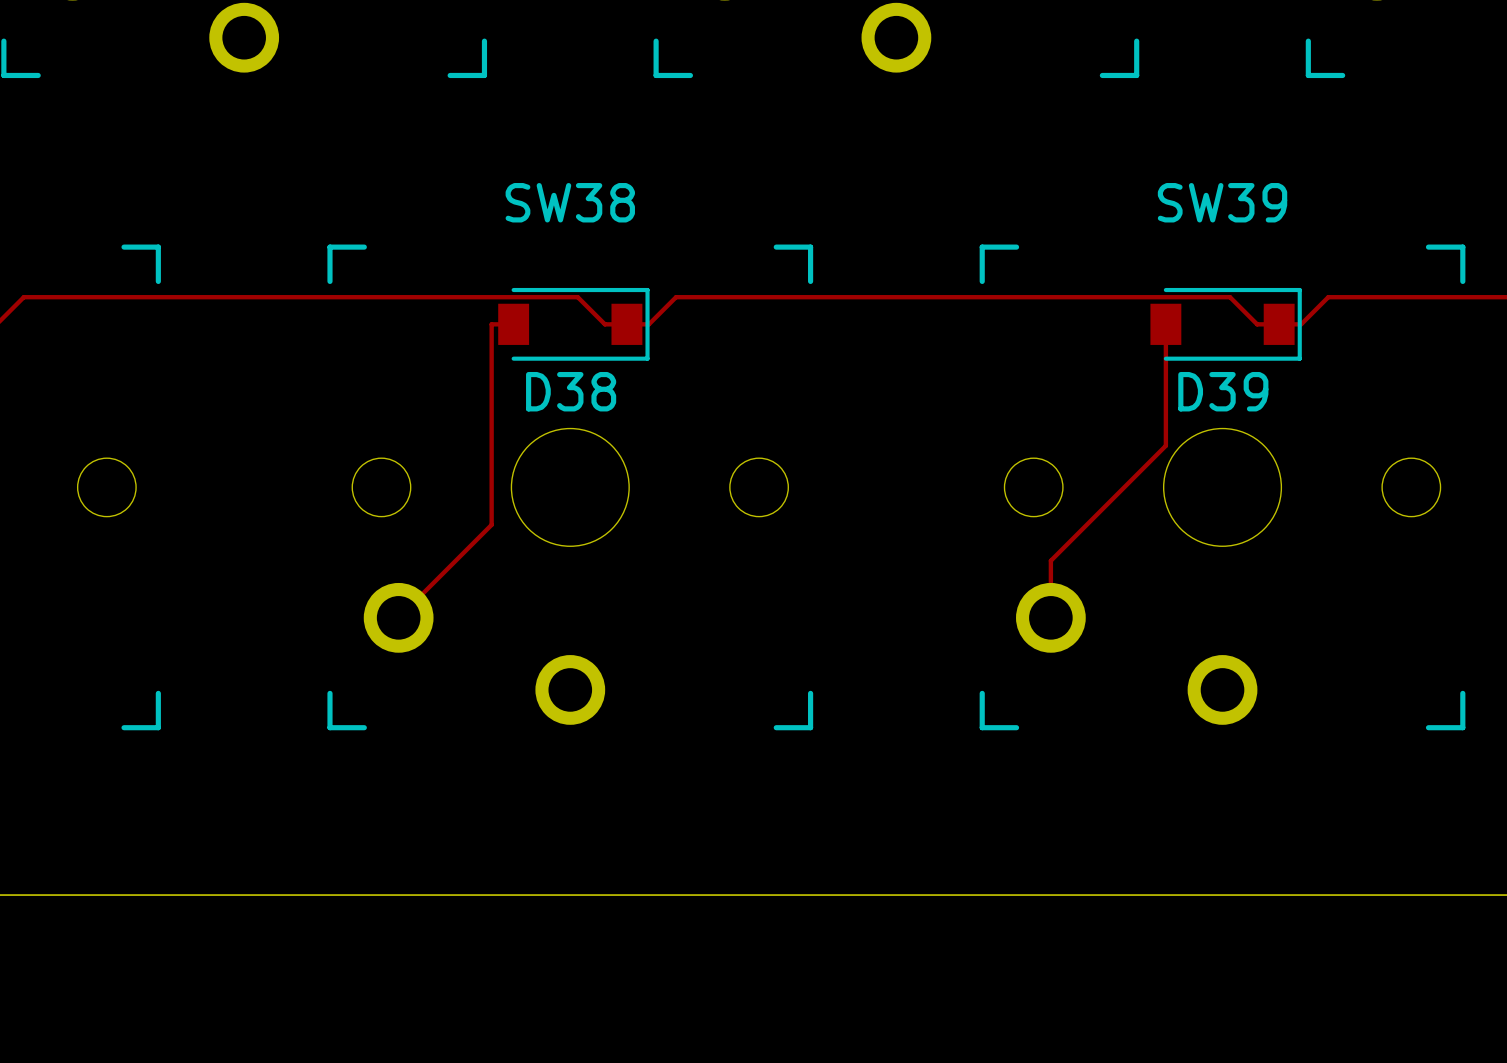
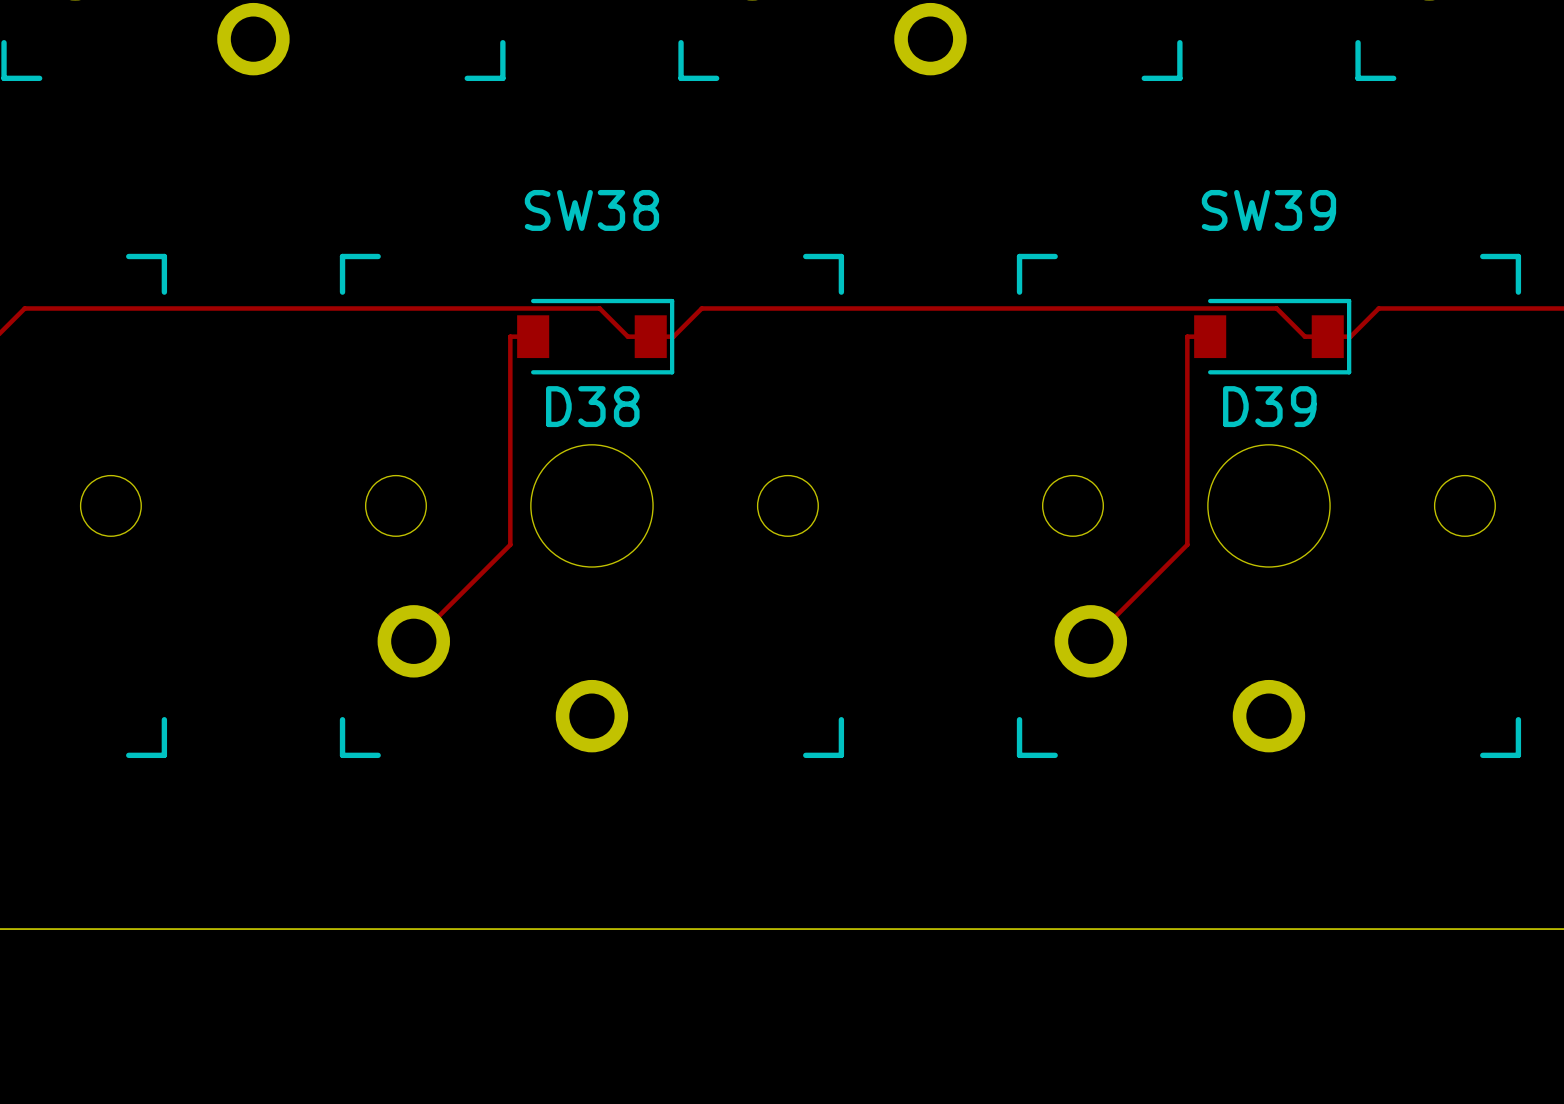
track: (1165, 324) (1165, 445) (1050, 560) (1050, 617) -> (1210, 336) (1187, 336) (1187, 544) (1090, 641)

